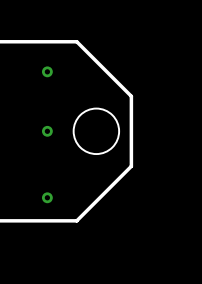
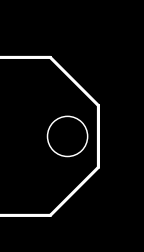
via: (47, 71) -> none
via: (47, 131) -> none
via: (47, 197) -> none

